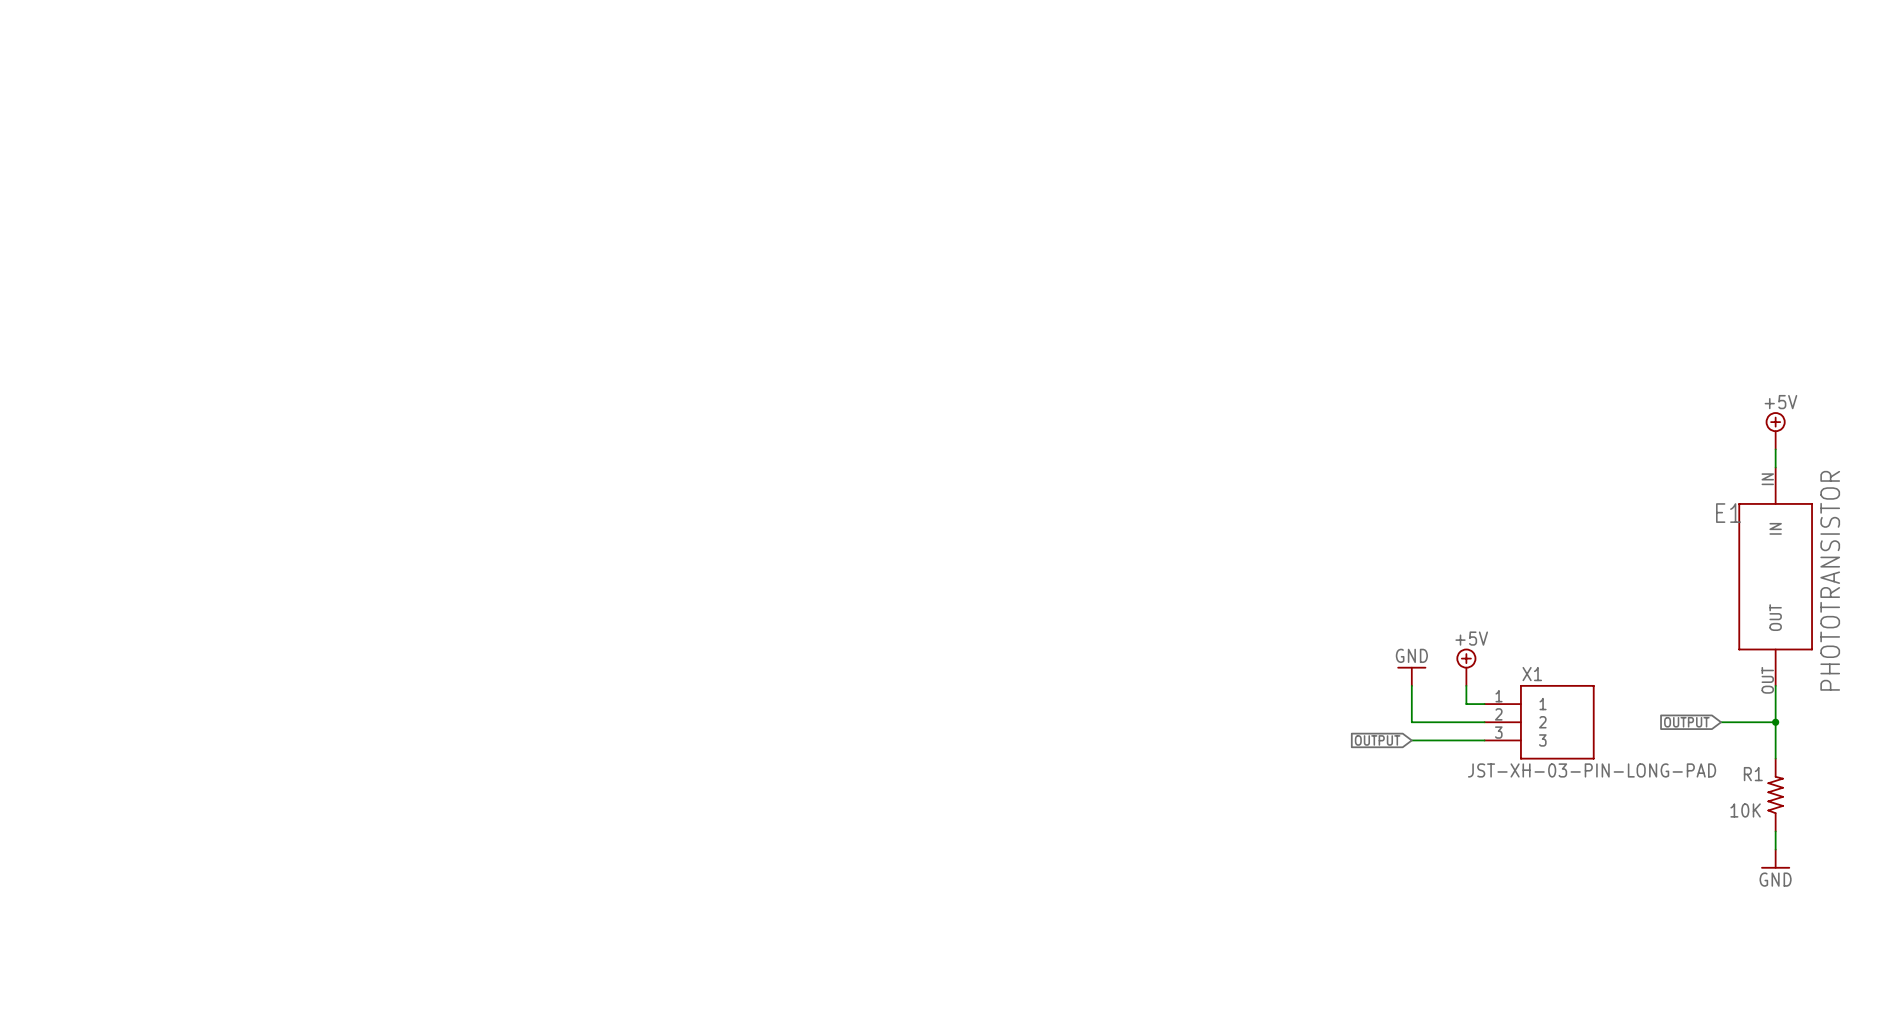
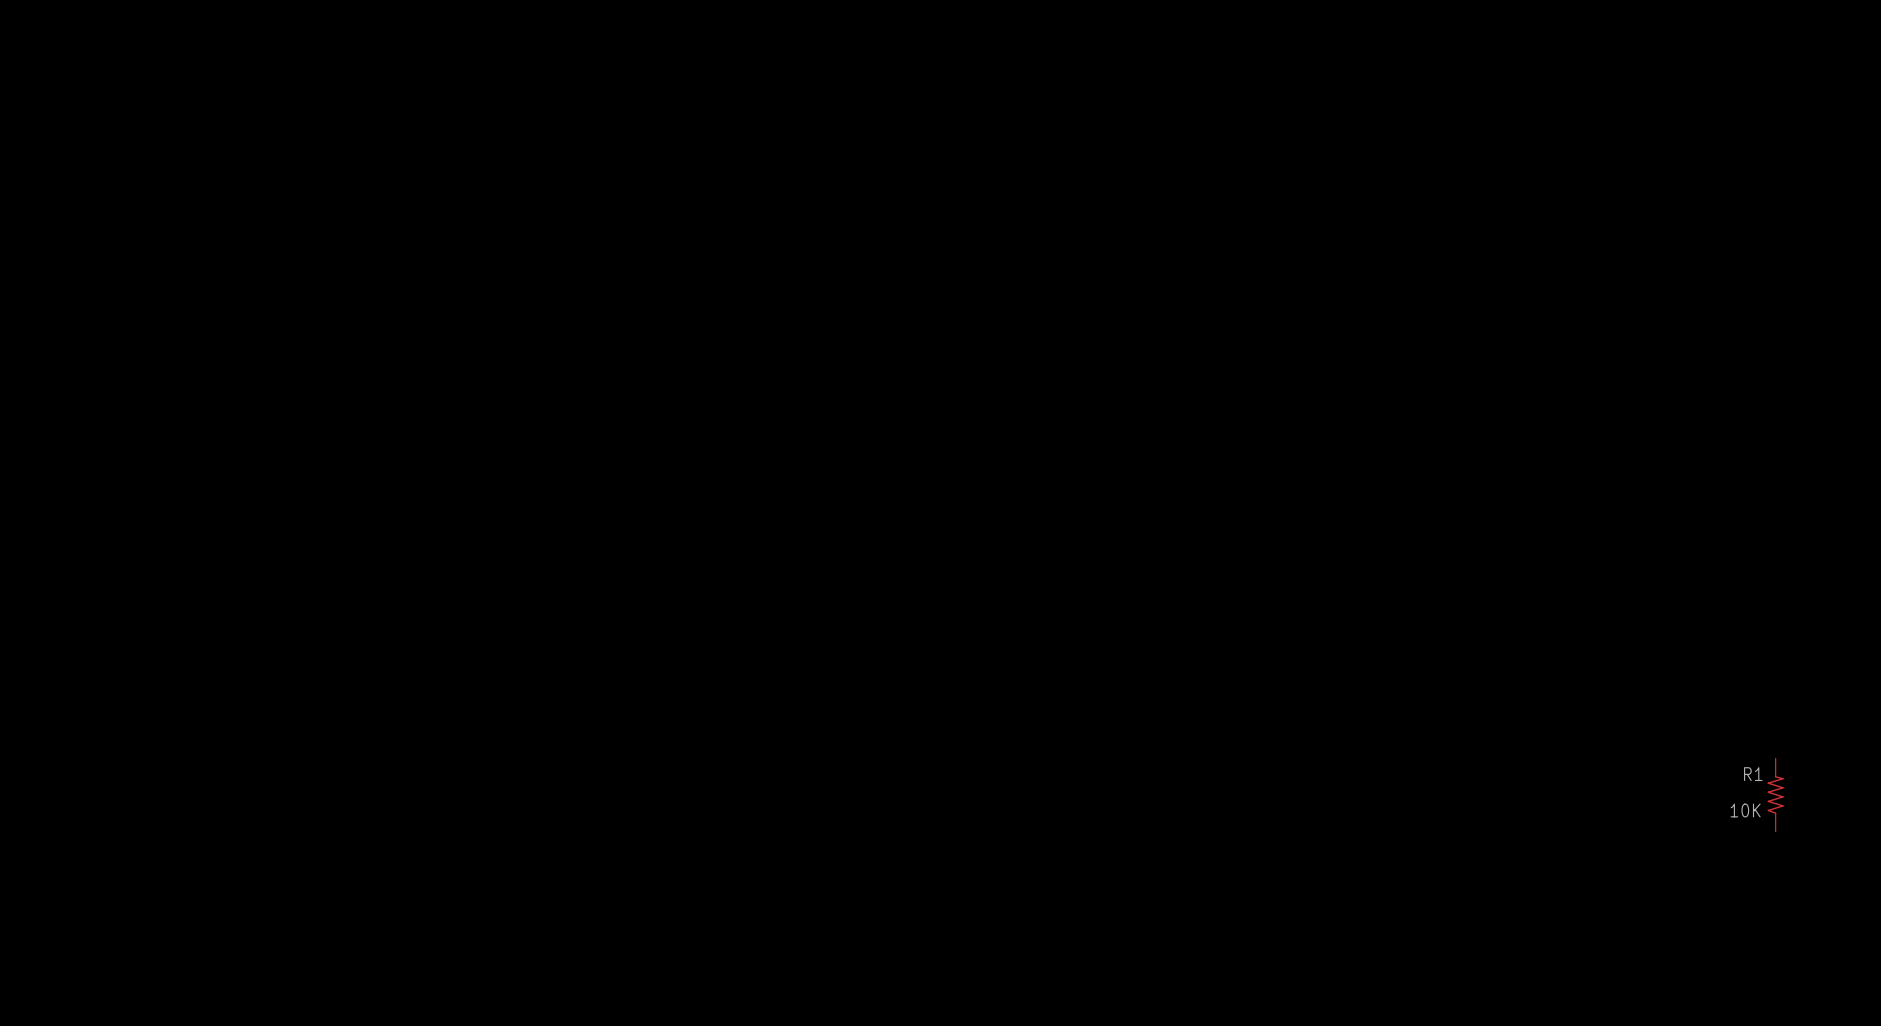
power symbol: +5V (1775, 430) -> none
wire: (1775, 449) (1775, 467) -> none
E1: PHOTOTRANSISTOR (1775, 576) -> none
power symbol: +5V (1466, 667) -> none
power symbol: GND (1411, 676) -> none
wire: (1411, 685) (1411, 722) (1484, 722) -> none
wire: (1466, 685) (1466, 704) (1484, 704) -> none
wire: (1775, 685) (1775, 758) -> none
X1: JST-XH-03-PIN-LONG-PAD (1539, 722) -> none
global label: OUTPUT (1686, 722) -> none
wire: (1721, 722) (1775, 722) -> none
junction: (1775, 722) -> none
global label: OUTPUT (1377, 740) -> none
wire: (1411, 740) (1484, 740) -> none
wire: (1775, 831) (1775, 849) -> none
power symbol: GND (1775, 859) -> none

